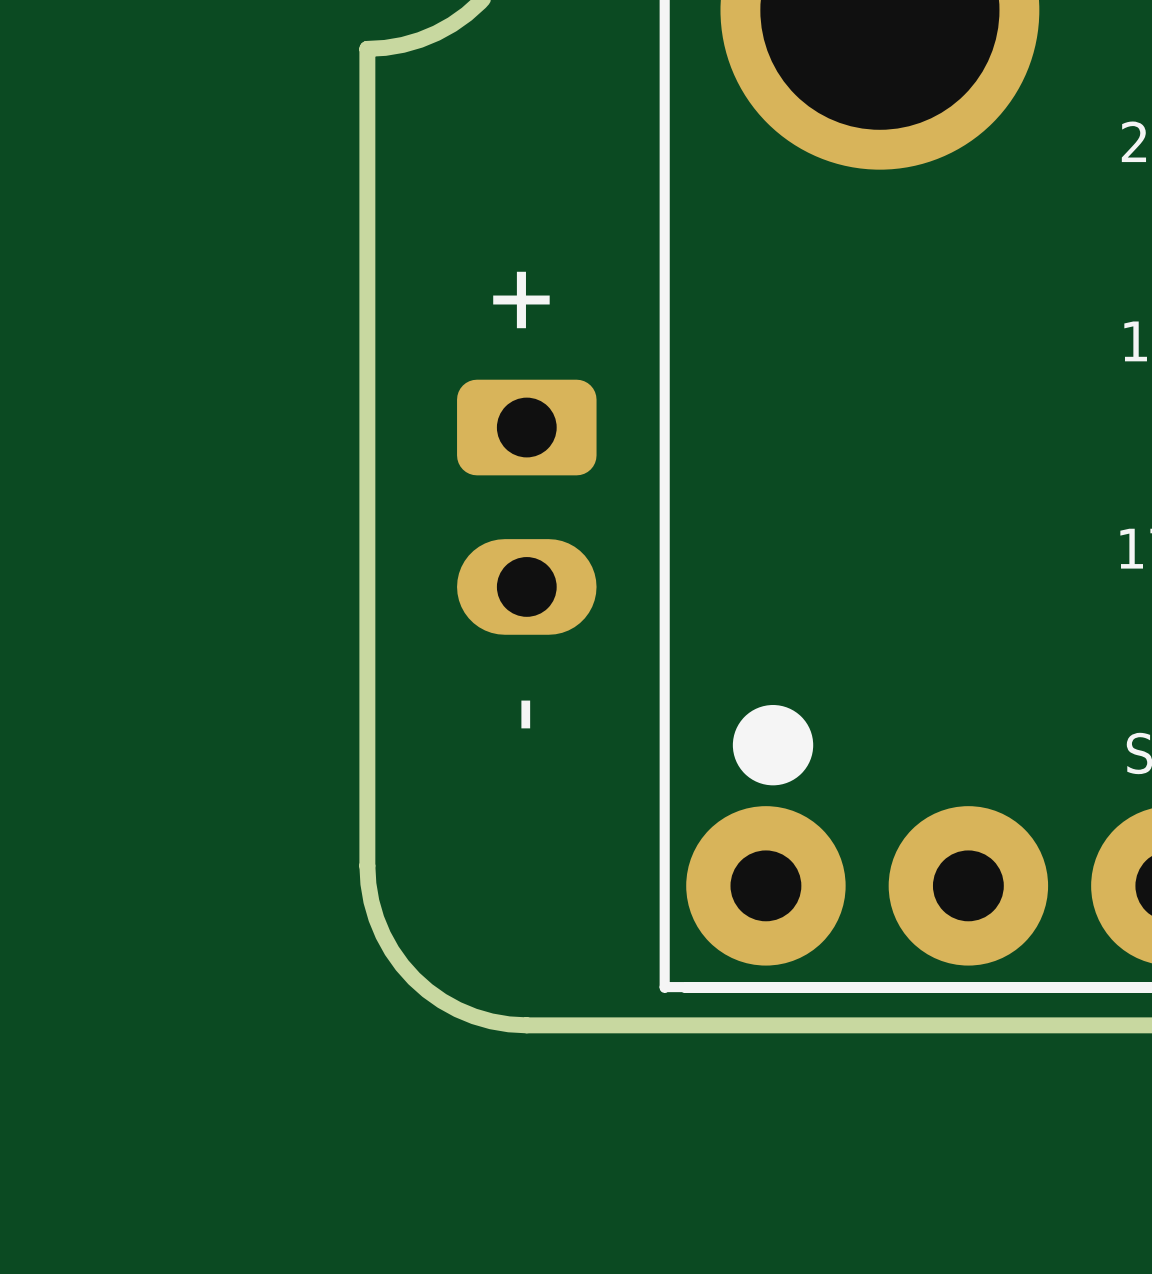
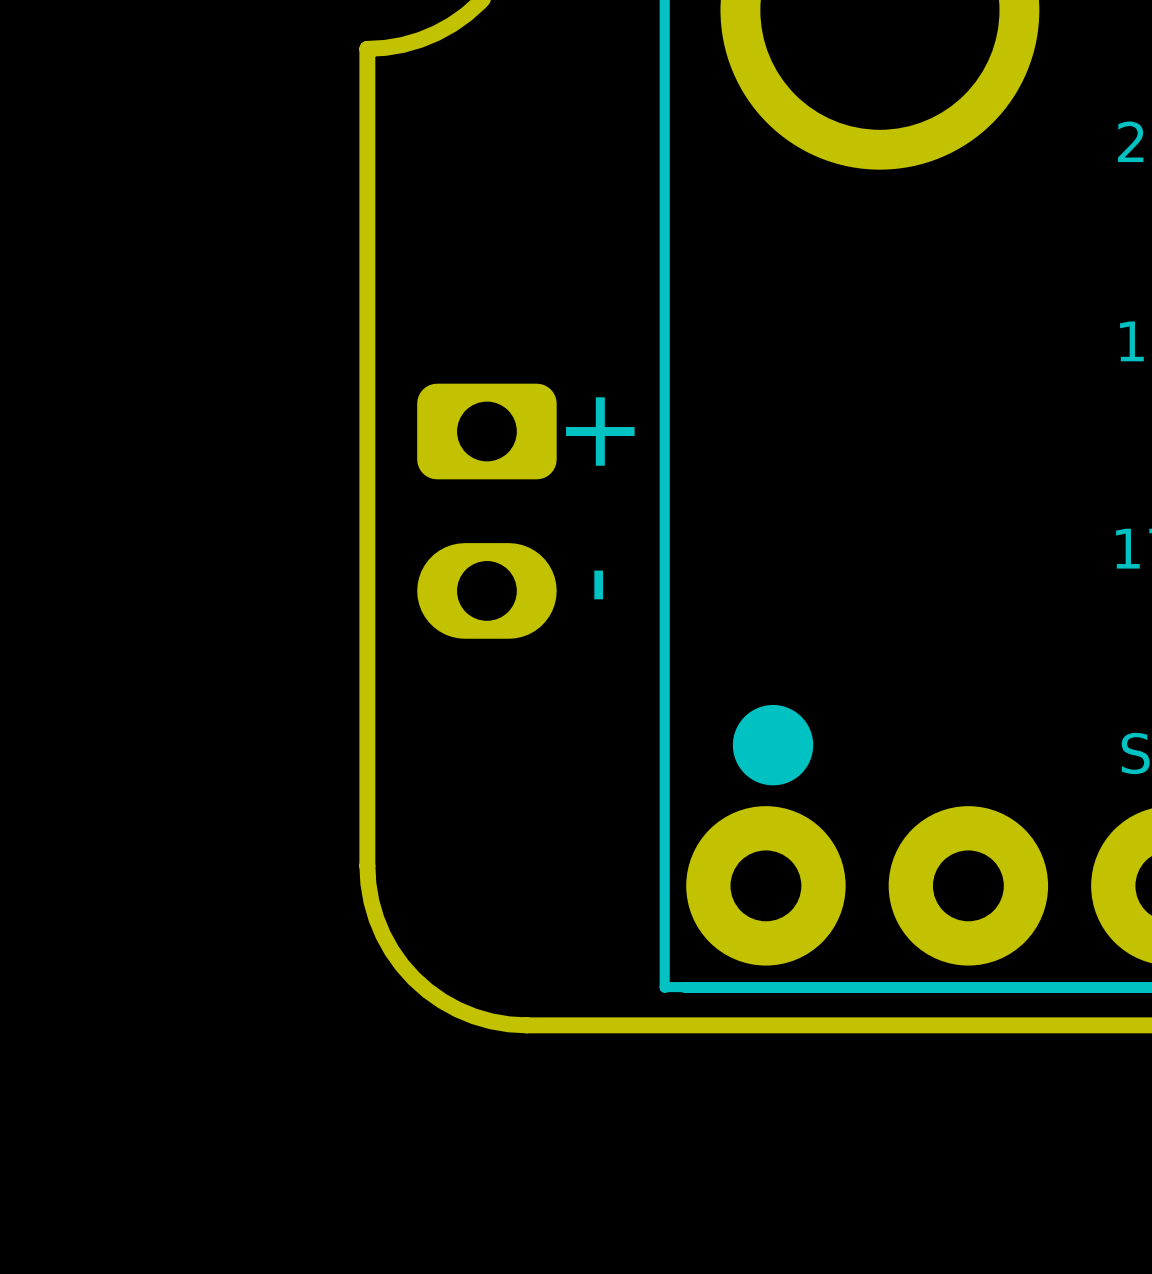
part text position: + (521, 299) -> + (600, 431)
part position: (526, 507) -> (486, 511)
part text position: - (525, 714) -> - (598, 584)

